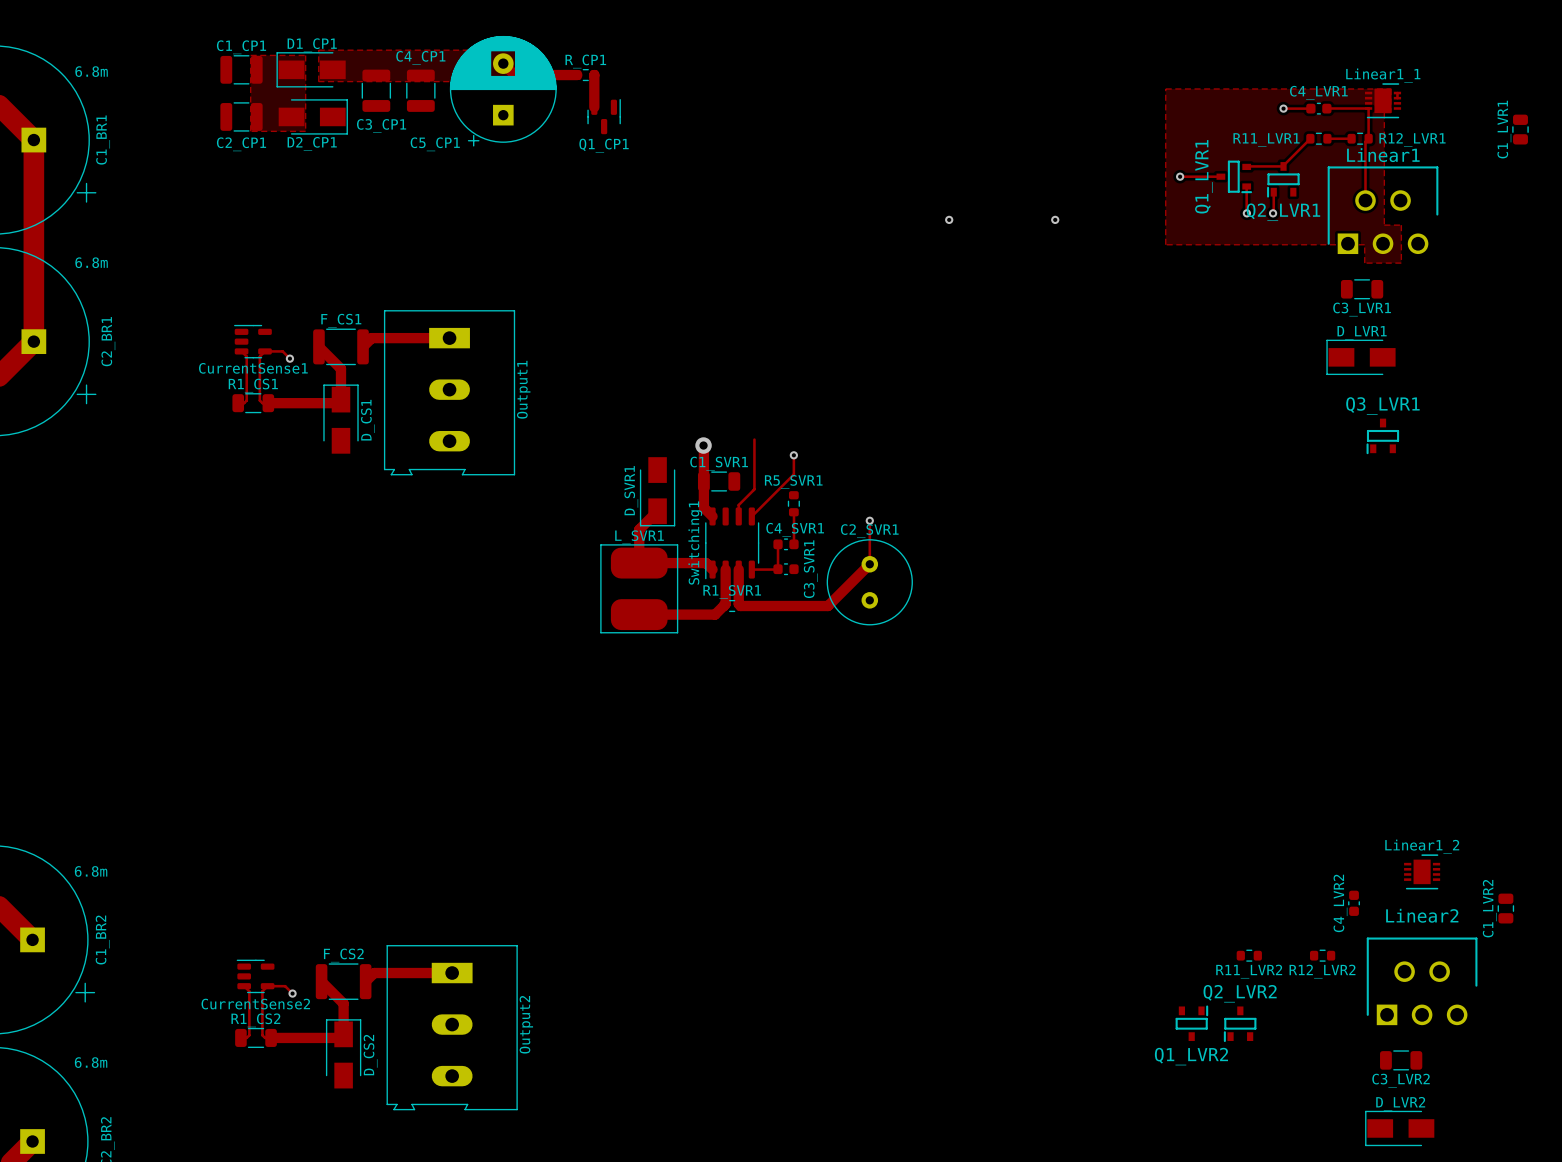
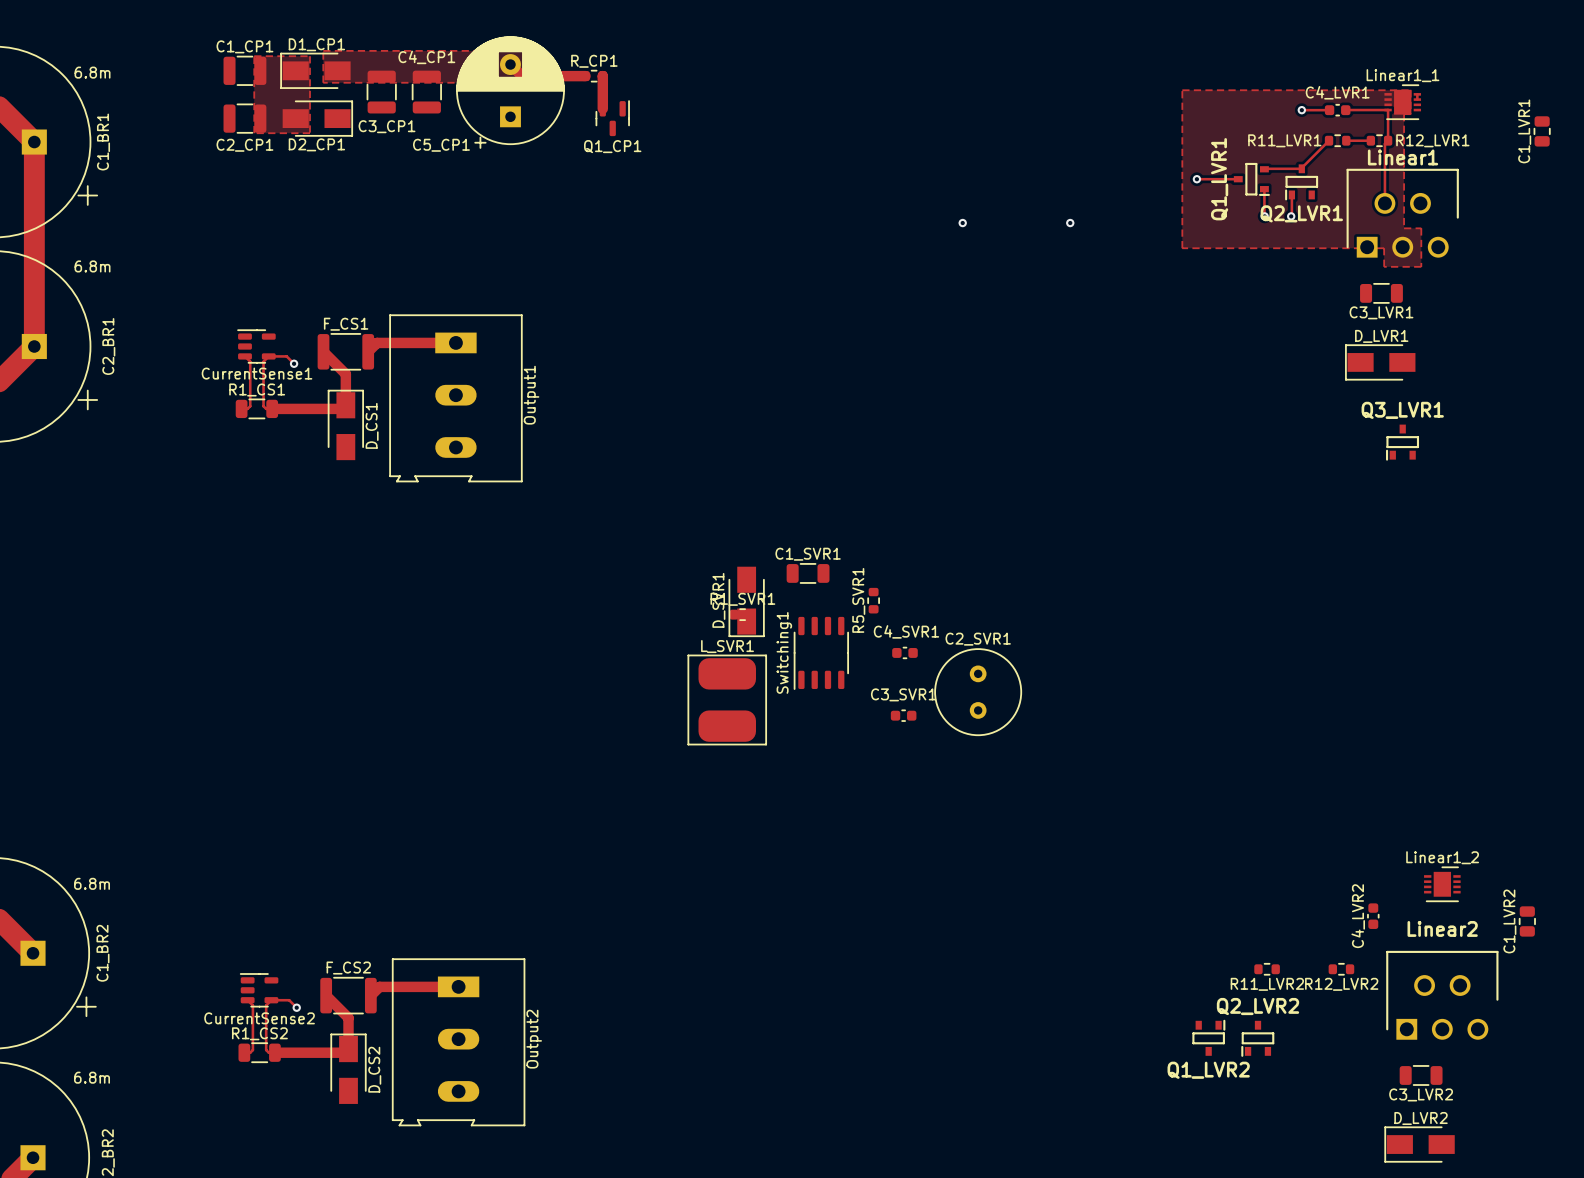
track: (754, 439) (754, 489) (738, 505) (738, 516) -> none
track: (703, 445) (703, 507) (712, 516) -> none
via: (703, 445) -> none
track: (793, 455) (793, 474) (751, 516) -> none
via: (793, 455) -> none
C1_SVR1 position: (719, 481) -> (808, 573)
R5_SVR1 name rotation: 0° (793, 481) -> 90° counterclockwise (858, 600)
D_SVR1 position: (657, 491) -> (746, 601)
R5_SVR1 position: (793, 503) -> (873, 600)
track: (657, 511) (639, 529) (639, 563) (706, 563) (712, 569) -> none
track: (794, 512) (794, 544) -> none
track: (869, 520) (869, 564) (828, 606) (740, 606) (738, 604) (738, 569) -> none
via: (869, 520) -> none
C4_SVR1 name position: C4_SVR1 (795, 529) -> C4_SVR1 (906, 631)
Switching1 position: (732, 543) -> (821, 653)
track: (778, 544) (777, 569) -> none
C4_SVR1 position: (786, 544) -> (904, 652)
track: (725, 569) (725, 604) (715, 614) (639, 614) -> none
track: (751, 569) (777, 569) -> none
C3_SVR1 position: (786, 569) -> (903, 715)
C3_SVR1 name rotation: 0° (810, 569) -> 90° clockwise (903, 694)
C2_SVR1 position: (869, 582) -> (978, 692)
L_SVR1 position: (639, 588) -> (727, 699)

